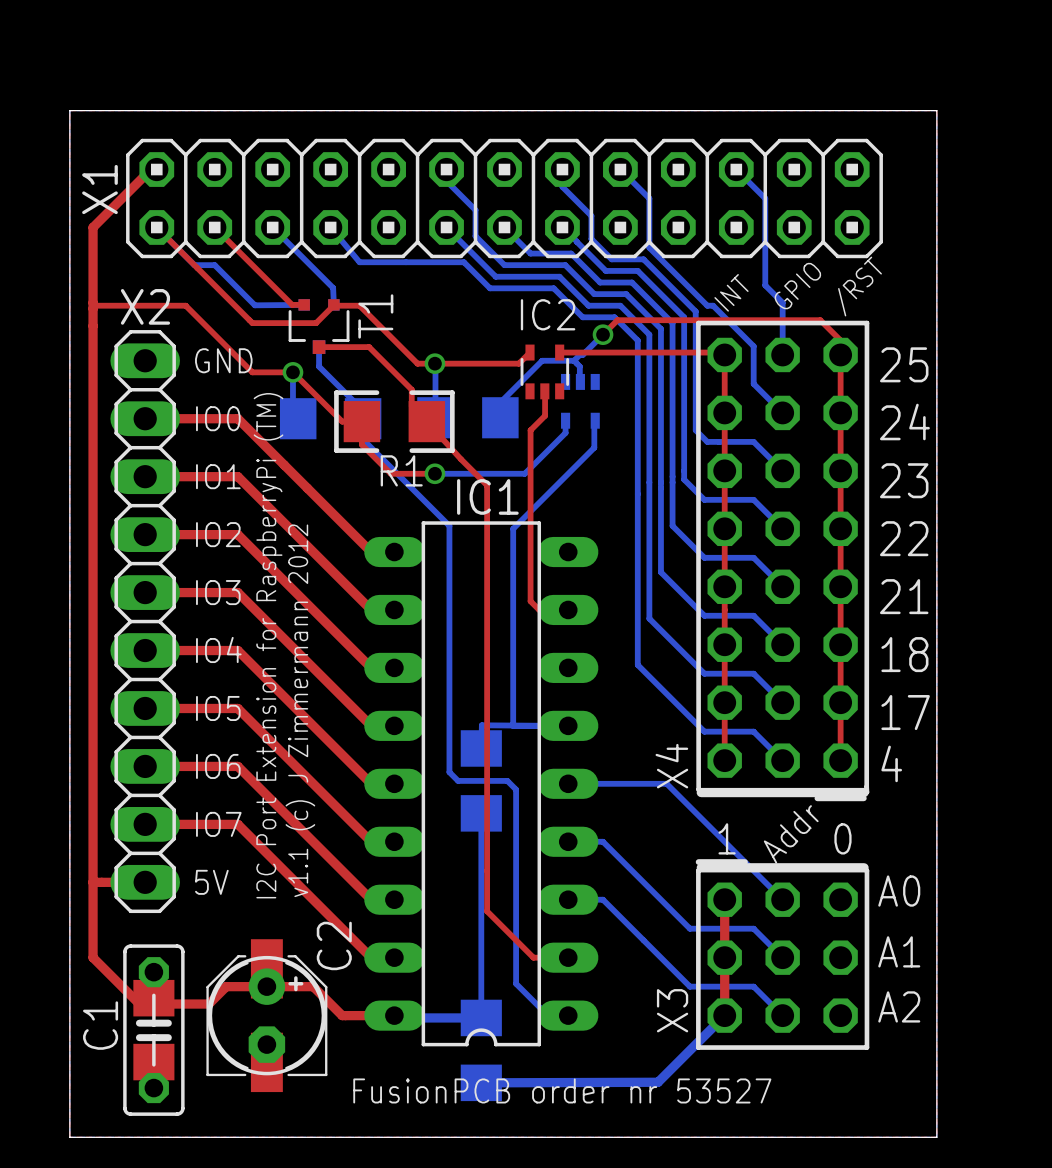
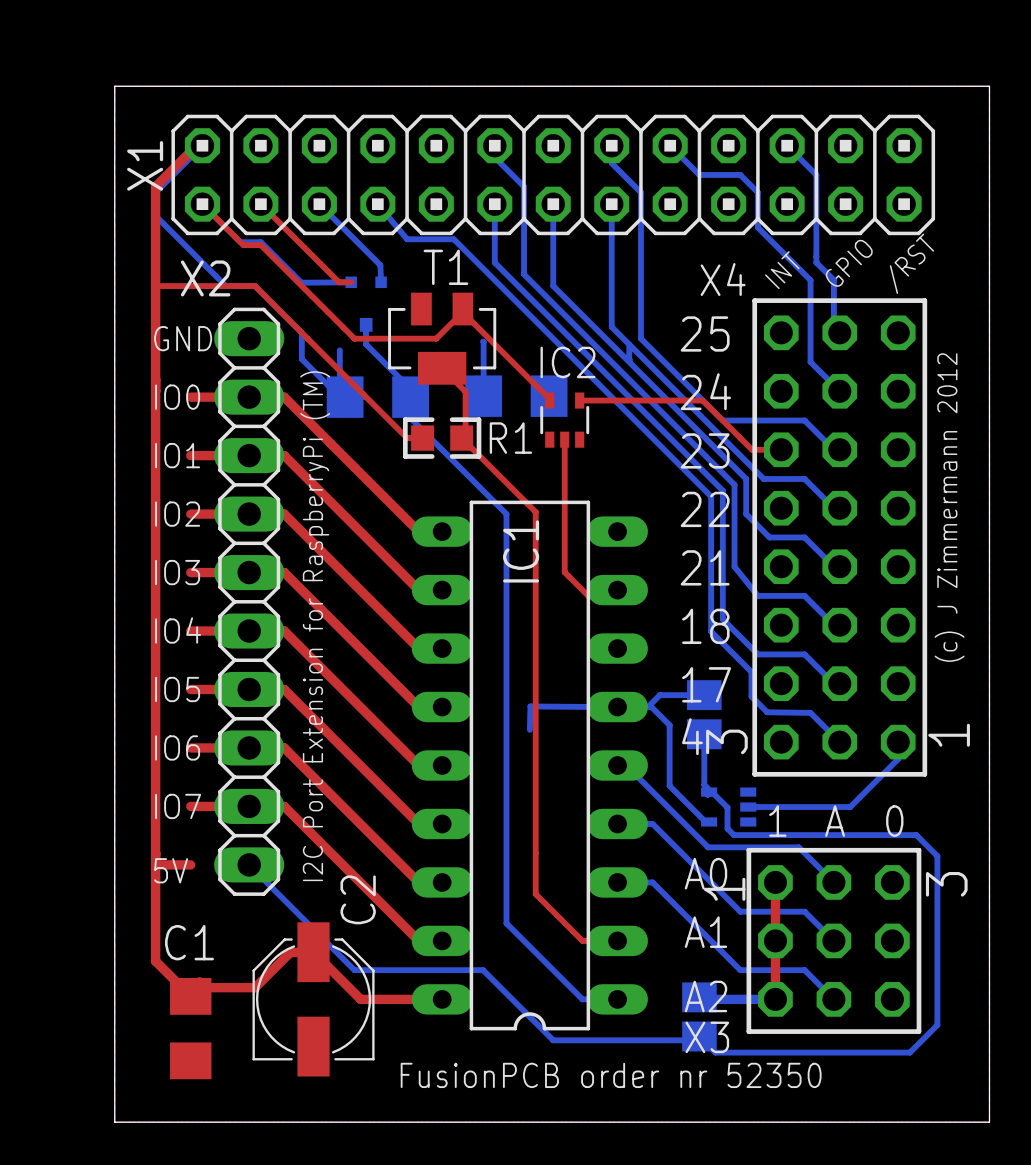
bottom track: none -> (202, 145) (155, 192) (155, 215) (225, 286) (255, 286) (301, 332) (301, 359) (328, 385) (354, 385) (364, 397)
bottom track: (649, 198) (649, 247) (707, 305) (713, 305) (753, 346) (753, 383) (782, 412) -> (699, 174) (740, 174) (757, 192) (757, 227) (810, 280) (810, 362) (839, 391)
top track: (110, 210) (93, 227) (93, 957) (142, 1006) (156, 1006) -> (155, 186) (155, 961) (190, 996) (199, 987) (208, 987)
bottom track: (446, 227) (495, 276) (559, 276) (588, 305) (620, 305) (649, 334) (649, 618) (704, 673) (707, 673) -> none
bottom track: (504, 227) (530, 253) (571, 253) (600, 282) (631, 282) (672, 323) (672, 511) -> (494, 204) (494, 262) (722, 490)
bottom track: none -> (553, 204) (553, 286) (746, 479) (746, 514) (769, 537)
bottom track: (562, 227) (565, 227) (605, 270) (637, 270) (684, 317) (684, 479) (704, 499) (713, 499) -> (629, 344) (763, 479)
bottom track: none -> (611, 204) (611, 326) (623, 338)
bottom track: (475, 236) (504, 265) (565, 265) (594, 294) (626, 294) (660, 328) (660, 517) -> (453, 239) (711, 496)
bottom track: none -> (524, 212) (524, 274) (734, 484) (734, 566) (757, 595)
bottom track: (591, 239) (611, 259) (643, 259) (695, 311) (695, 430) (707, 441) -> (640, 215) (640, 338) (722, 420) (757, 420)
bottom track: (405, 262) (463, 262) (490, 288) (553, 288) (582, 317) (614, 317) (637, 340) (637, 665) (704, 731) (753, 731) (782, 760) -> none
top track: (197, 268) (252, 323) (316, 323) (333, 304) (359, 305) (417, 363) (518, 363) (530, 352) -> (243, 245) (260, 245) (354, 338) (436, 338) (462, 312) (462, 309)
T1 footprint: [288, 299, 350, 354] -> [388, 292, 497, 385]
top track: (93, 302) (95, 305) (185, 305) (252, 372) (292, 372) (342, 421) (361, 421) (361, 444) (390, 473) (434, 473) -> none
X2 name position: X2 (145, 306) -> X2 (205, 278)
top track: none -> (155, 286) (255, 286) (407, 438) (422, 438)
T1 name position: T1 (375, 316) -> T1 (445, 267)
X4 footprint: [696, 320, 870, 802] -> [752, 298, 928, 777]
top track: none -> (462, 309) (460, 307) (460, 309) (549, 400)
top track: (603, 334) (617, 320) (820, 320) (840, 340) (840, 760) -> none
bottom track: (603, 334) (582, 354) (579, 354) (574, 360) (542, 360) (500, 402) (500, 417) -> none
via: (603, 334) -> none
top track: (319, 347) (369, 347) (411, 389) (411, 406) (487, 485) (487, 532) -> (461, 438) (535, 512)
top track: (559, 352) (722, 352) (724, 354) (724, 760) -> none
text position: GND (223, 360) -> GND (183, 338)
via: (434, 363) -> none
text position: 25 (904, 364) -> 25 (705, 333)
IC2 position: (544, 371) -> (564, 420)
via: (292, 372) -> none
R1 footprint: [334, 390, 455, 453] -> [403, 417, 482, 459]
top track: none -> (442, 368) (465, 391) (465, 438) (459, 438) (459, 443)
top track: (545, 391) (545, 415) (530, 430) (530, 601) (539, 609) (568, 609) -> (564, 439) (564, 572) (588, 595) (611, 595) (617, 590)
part rotation: 0° (580, 401) -> 90° clockwise (728, 807)
part position: (580, 401) -> (728, 807)
text position: IO0 (218, 418) -> IO0 (177, 397)
bottom track: (565, 420) (565, 432) (524, 473) (434, 473) -> none
bottom track: (595, 420) (594, 447) (513, 528) (513, 725) (568, 725) -> (709, 821) (705, 821) (669, 785) (669, 725) (651, 707) (617, 707)
top track: none -> (579, 400) (702, 400) (752, 449) (781, 449)
text position: 24 (904, 422) -> 24 (705, 391)
R1 name position: R1 (401, 470) -> R1 (510, 438)
via: (434, 473) -> none
text position: IO1 (218, 476) -> IO1 (177, 455)
text position: 23 (904, 480) -> 23 (705, 450)
IC1 name rotation: 0° (487, 496) -> 90° counterclockwise (521, 551)
bottom track: (449, 525) (449, 772) (458, 780) (507, 780) (516, 789) (516, 983) (547, 1015) -> (497, 505) (506, 514) (506, 923) (582, 999) (597, 999)
bottom track: (672, 525) (704, 557) (718, 557) -> (722, 505) (722, 619) (757, 654)
text: none -> (c) J Zimmermann 2012 (949, 507)
text position: IO2 (218, 534) -> IO2 (177, 514)
text position: 22 (904, 538) -> 22 (705, 509)
bottom track: (660, 572) (704, 615) (707, 615) -> (711, 552) (711, 631) (751, 671) (751, 696) (767, 712) (810, 712) (839, 742)
text position: IO3 (218, 592) -> IO3 (177, 572)
text position: 21 (904, 596) -> 21 (705, 567)
X2 position: (145, 621) -> (249, 601)
text position: IO4 (218, 649) -> IO4 (178, 630)
text position: 18 (904, 654) -> 18 (705, 626)
text position: IO5 (218, 708) -> IO5 (177, 689)
text: v1.1 (c) J Zimmermann 2012 (300, 710) -> none
text position: 17 (905, 712) -> 17 (706, 684)
bottom track: none -> (704, 695) (659, 695) (647, 707)
part: none -> (704, 714)
bottom track: none -> (704, 734) (704, 784) (710, 791) (707, 794) (709, 792)
bottom track: none -> (898, 742) (898, 759) (850, 807) (748, 807)
text position: 4 (891, 763) -> 4 (692, 736)
text position: IO6 (218, 766) -> IO6 (177, 747)
X4 name position: X4 (671, 766) -> X4 (723, 279)
part: (481, 780) -> none
bottom track: (568, 783) (666, 783) (747, 864) -> (618, 764) (625, 764) (708, 847) (798, 847)
bottom track: none -> (709, 792) (712, 792) (727, 807) (727, 828) (733, 835) (916, 835) (937, 856) (937, 1025) (909, 1052) (715, 1052) (697, 1034)
bottom track: (481, 813) (481, 1017) (411, 1017) (394, 1015) -> none
text position: IO7 (218, 824) -> IO7 (178, 806)
text: Addr (791, 834) -> A (835, 821)
X3 footprint: [695, 859, 870, 1050] -> [746, 847, 922, 1034]
top track: (93, 882) (110, 882) -> none
bottom track: none -> (249, 864) (354, 970) (483, 970) (553, 1040) (687, 1040) (687, 1034) (699, 1034) (705, 1040)
text position: 5V (211, 882) -> 5V (171, 870)
text position: A0 (899, 891) -> A0 (705, 873)
C2 name position: C2 (334, 945) -> C2 (358, 899)
text position: A1 (899, 951) -> A1 (705, 932)
top track: (226, 986) (313, 986) (342, 1015) -> (272, 970) (290, 952) (313, 952) (360, 999) (389, 999)
text position: A2 (899, 1006) -> A2 (705, 996)
part: (266, 1015) -> none
bottom track: (724, 1015) (658, 1082) (481, 1082) -> (775, 999) (701, 999) (699, 997)
C1 name rotation: 0° (100, 1025) -> 90° clockwise (189, 942)
C1 name position: C1 (100, 1025) -> C1 (189, 942)
C1 position: (153, 1030) -> (190, 1028)
part: (153, 1030) -> none
part: none -> (699, 1016)
part: (481, 1050) -> none
text: FusionPCB order nr 53527 (562, 1090) -> FusionPCB order nr 52350 (611, 1075)

